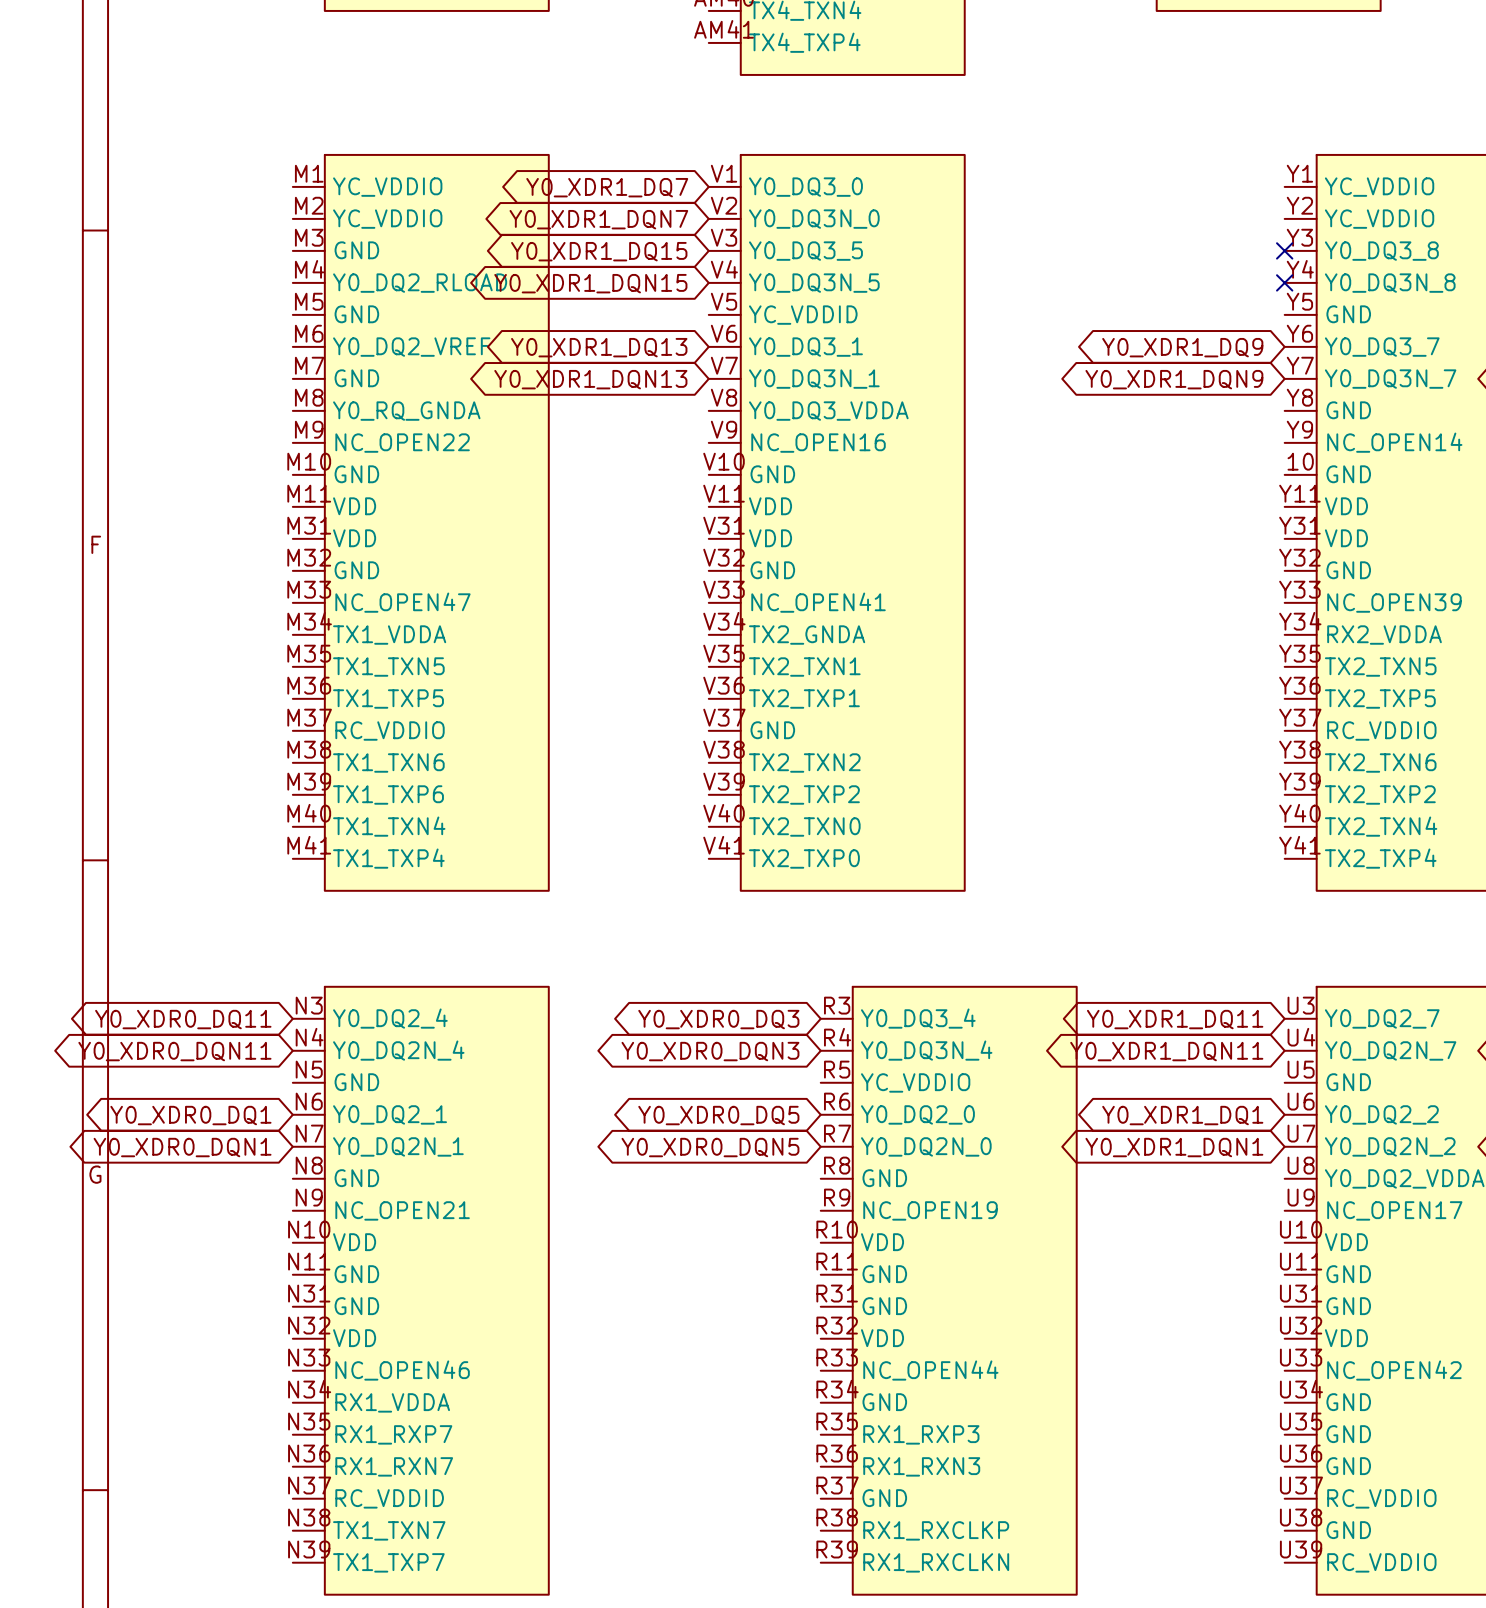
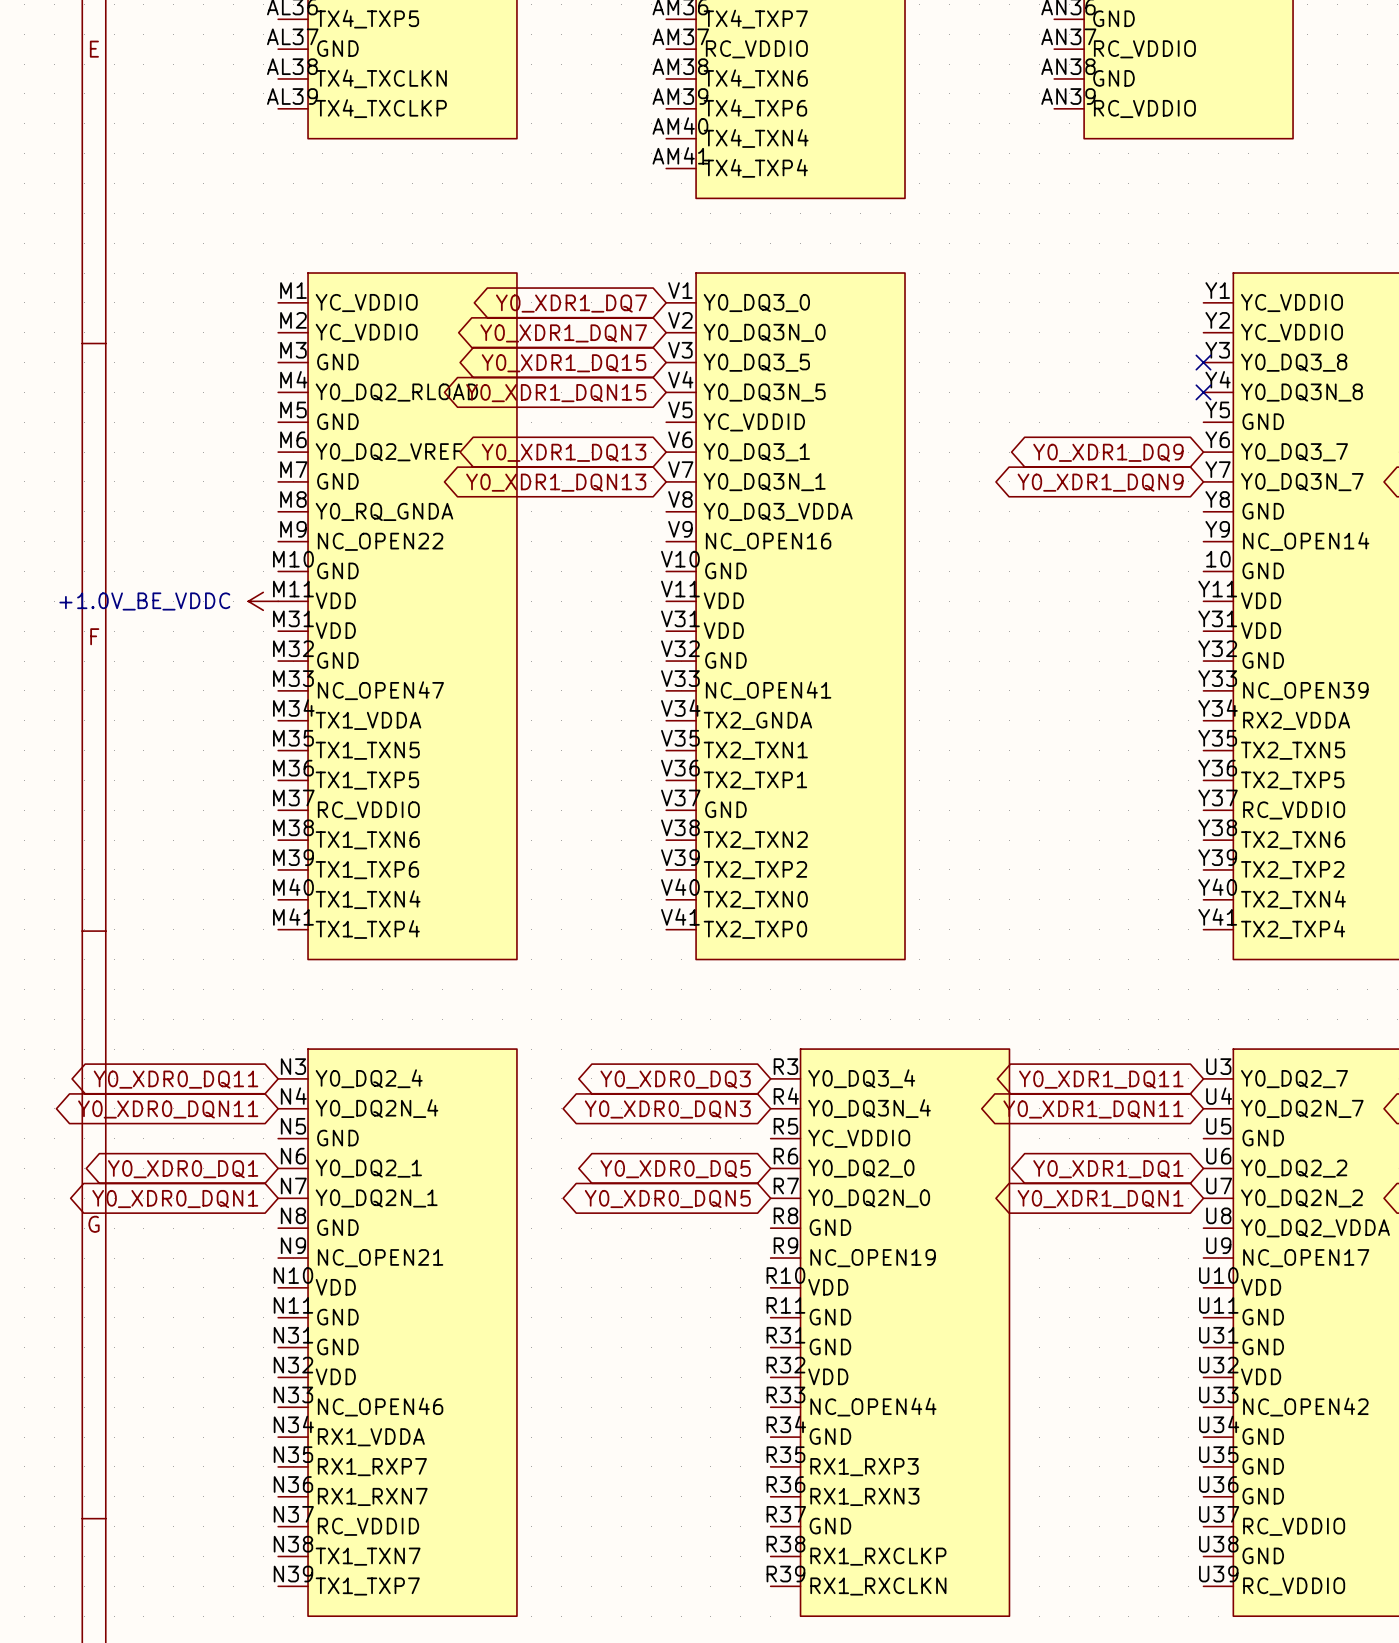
power symbol: none -> +1.0V_BE_VDDC (263, 601)

